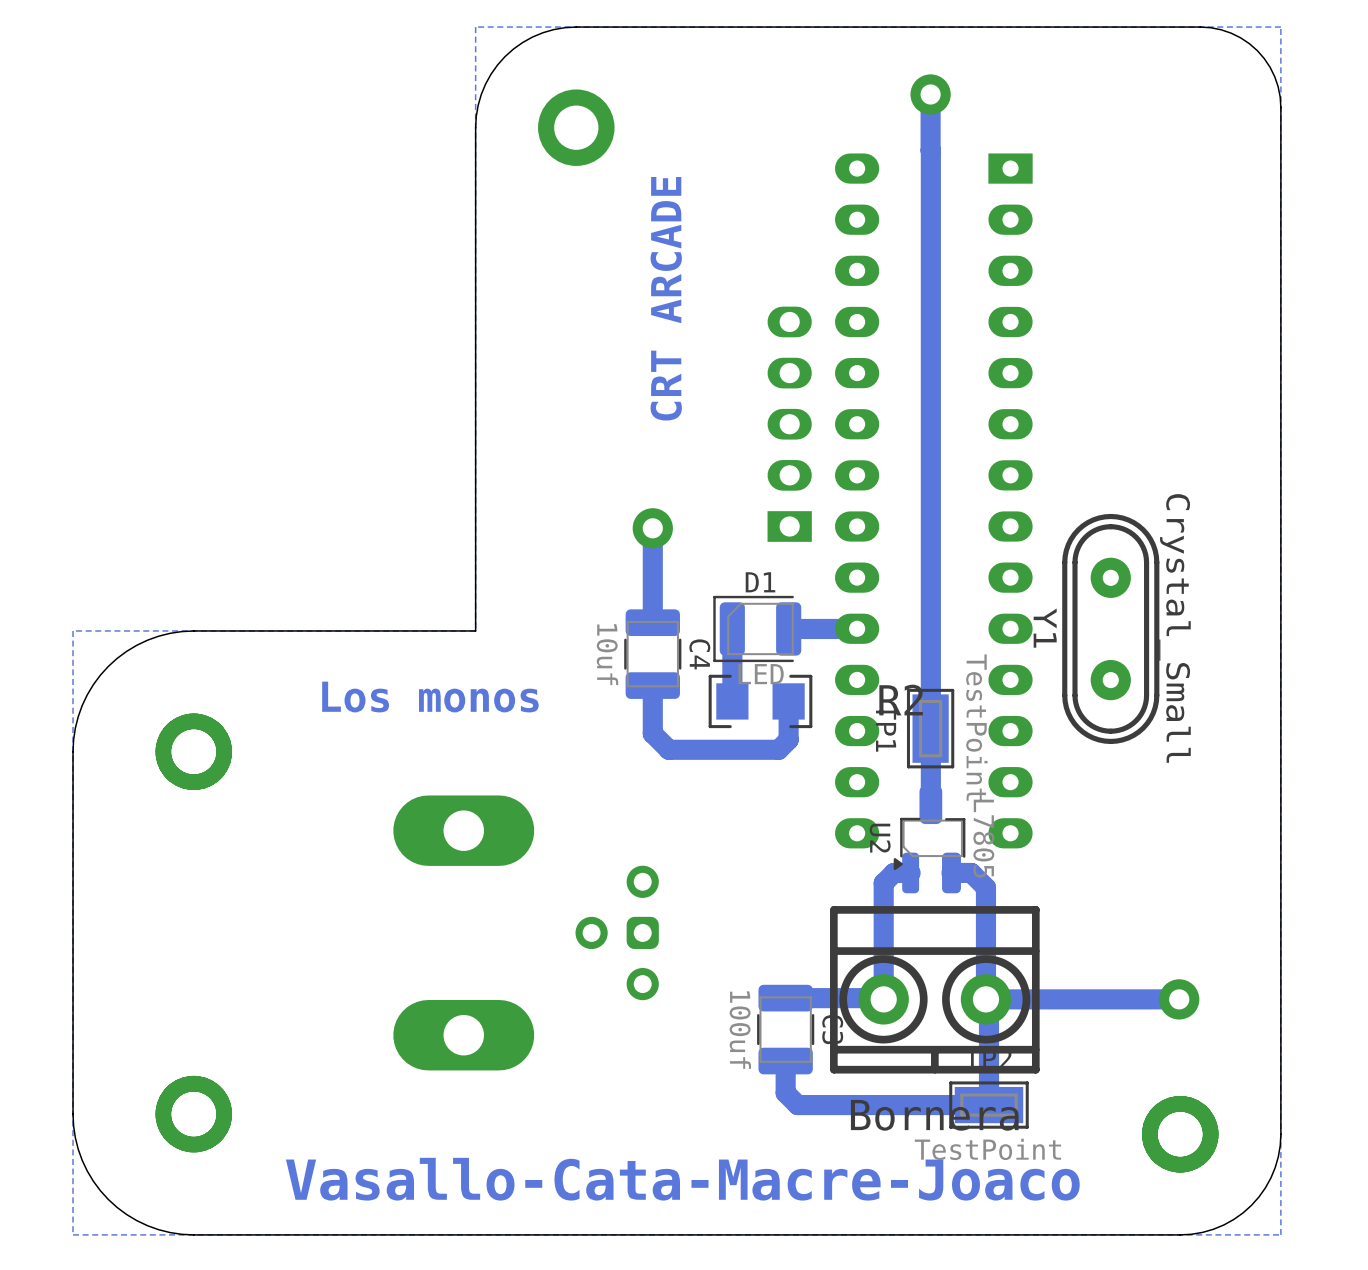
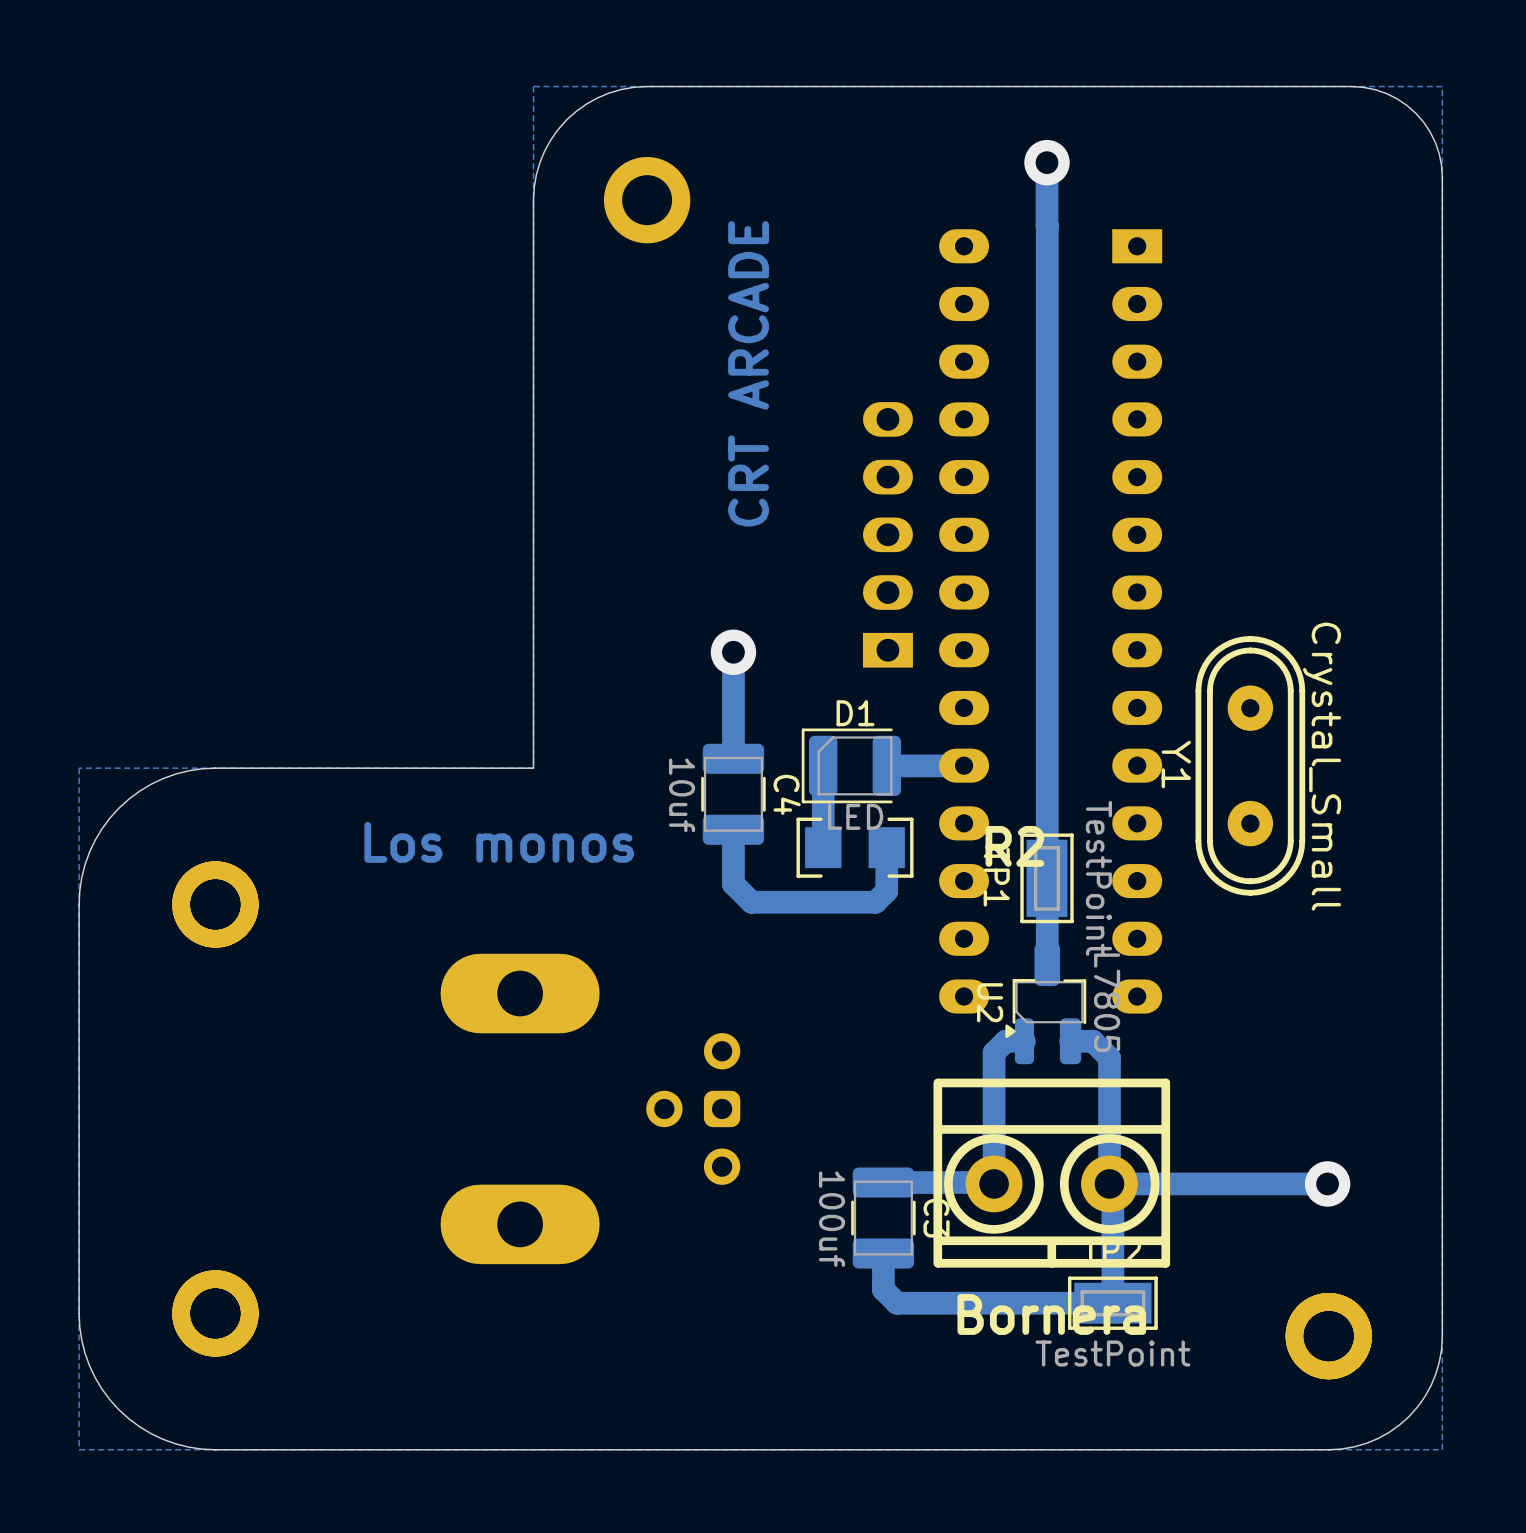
text: Vasallo-Cata-Macre-Joaco (682, 1179) -> none

